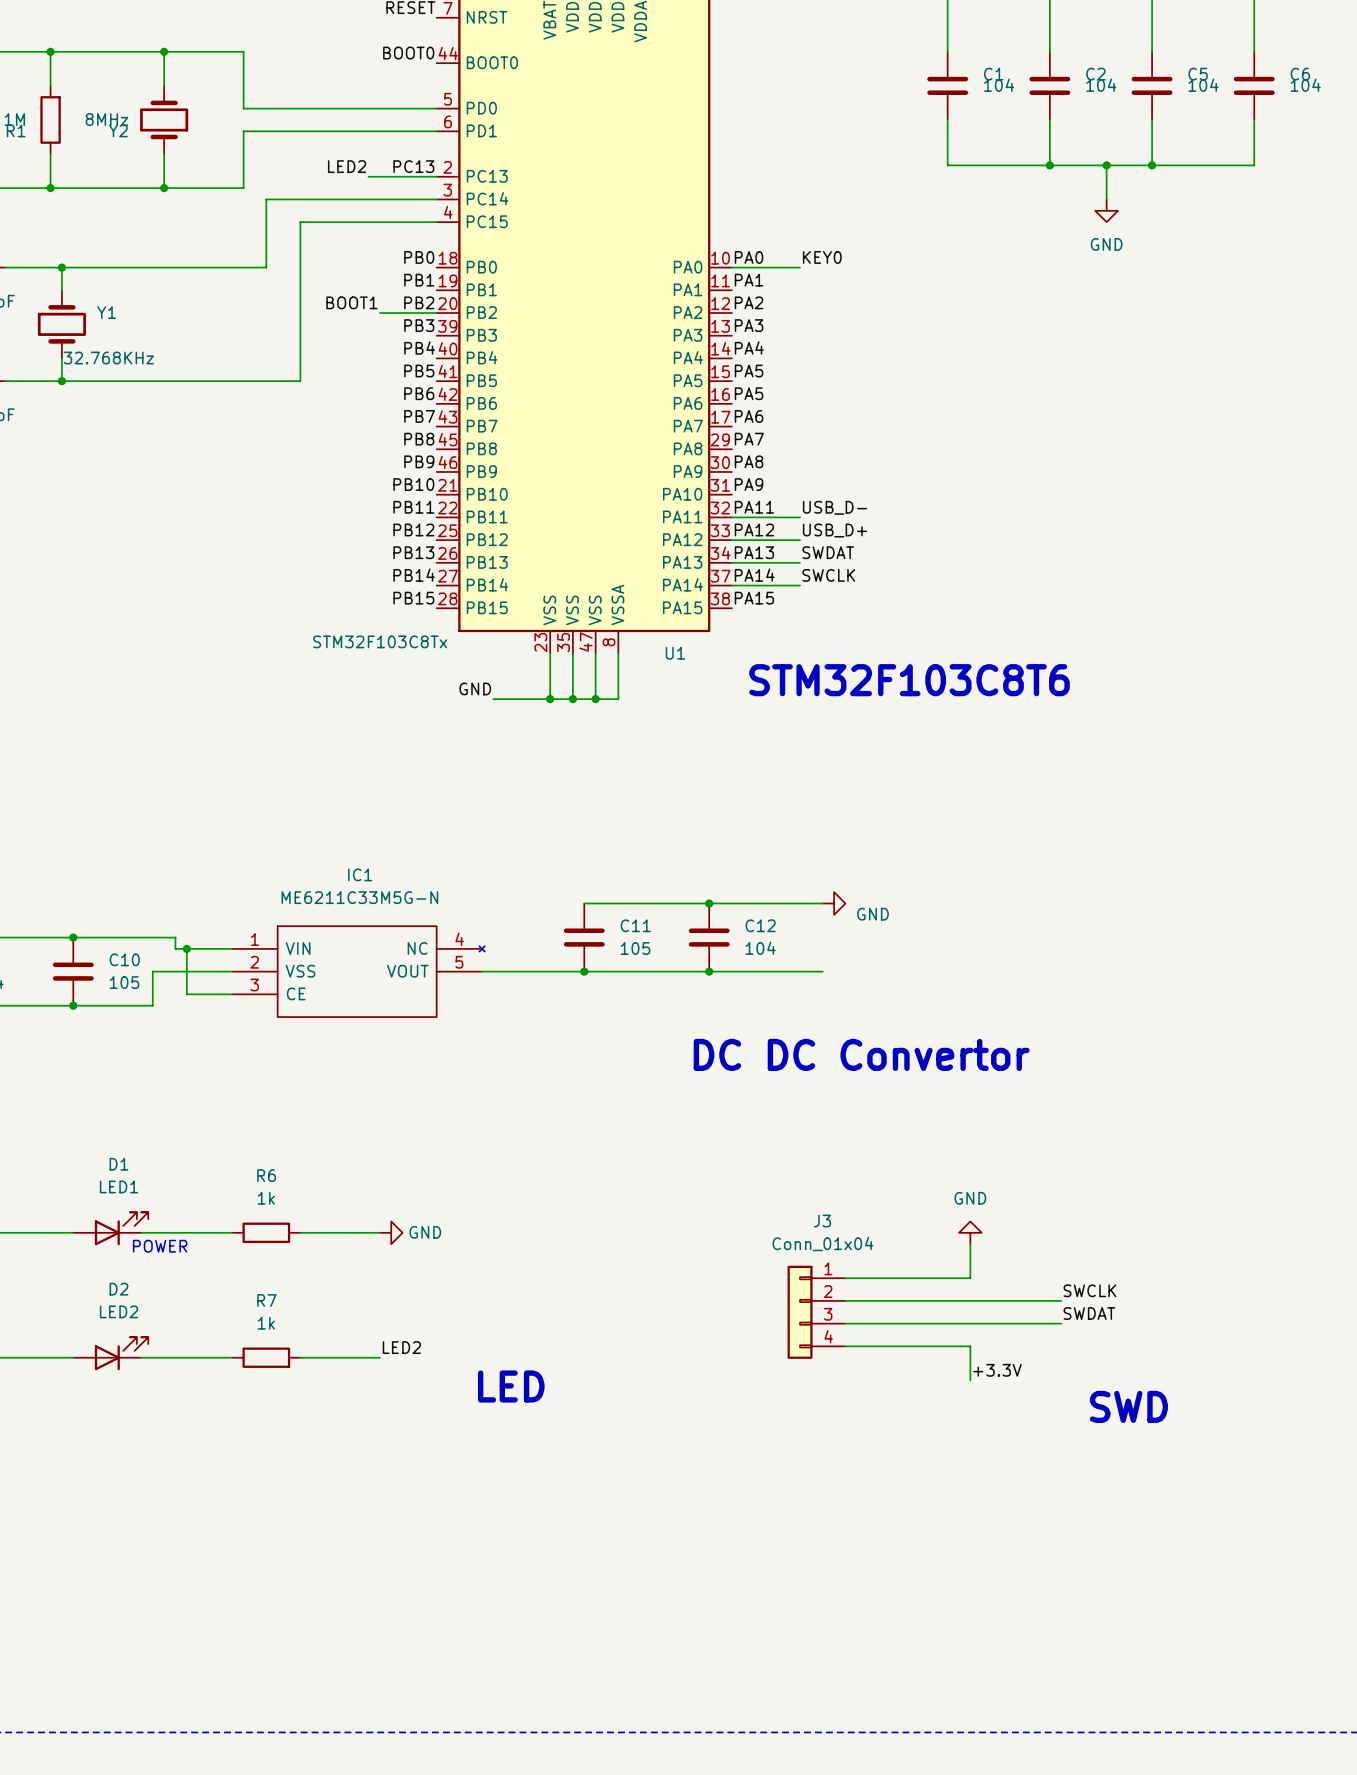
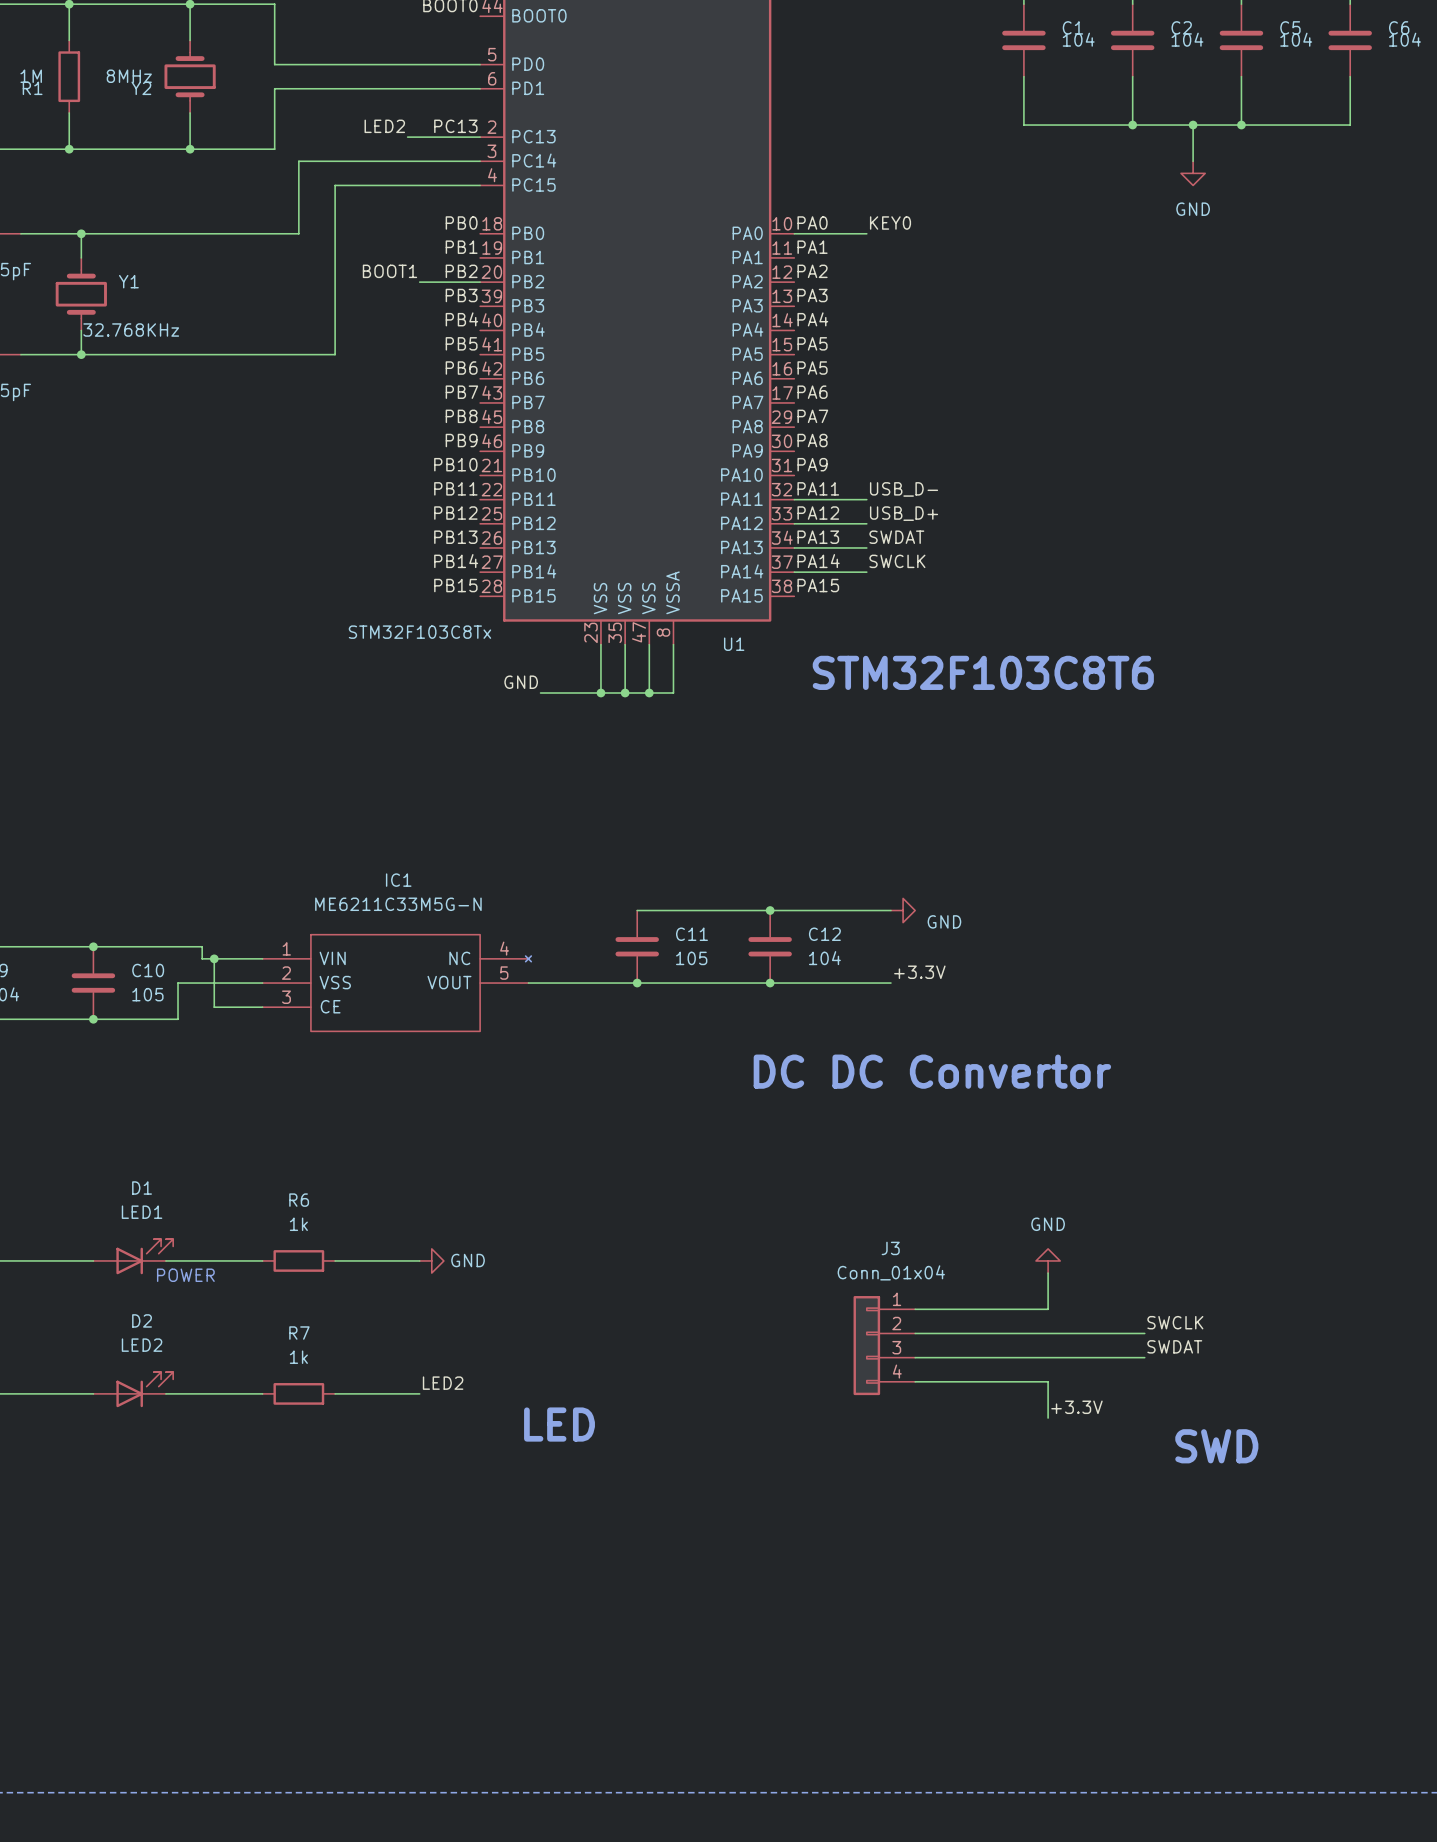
label: none -> +3.3V (919, 972)

